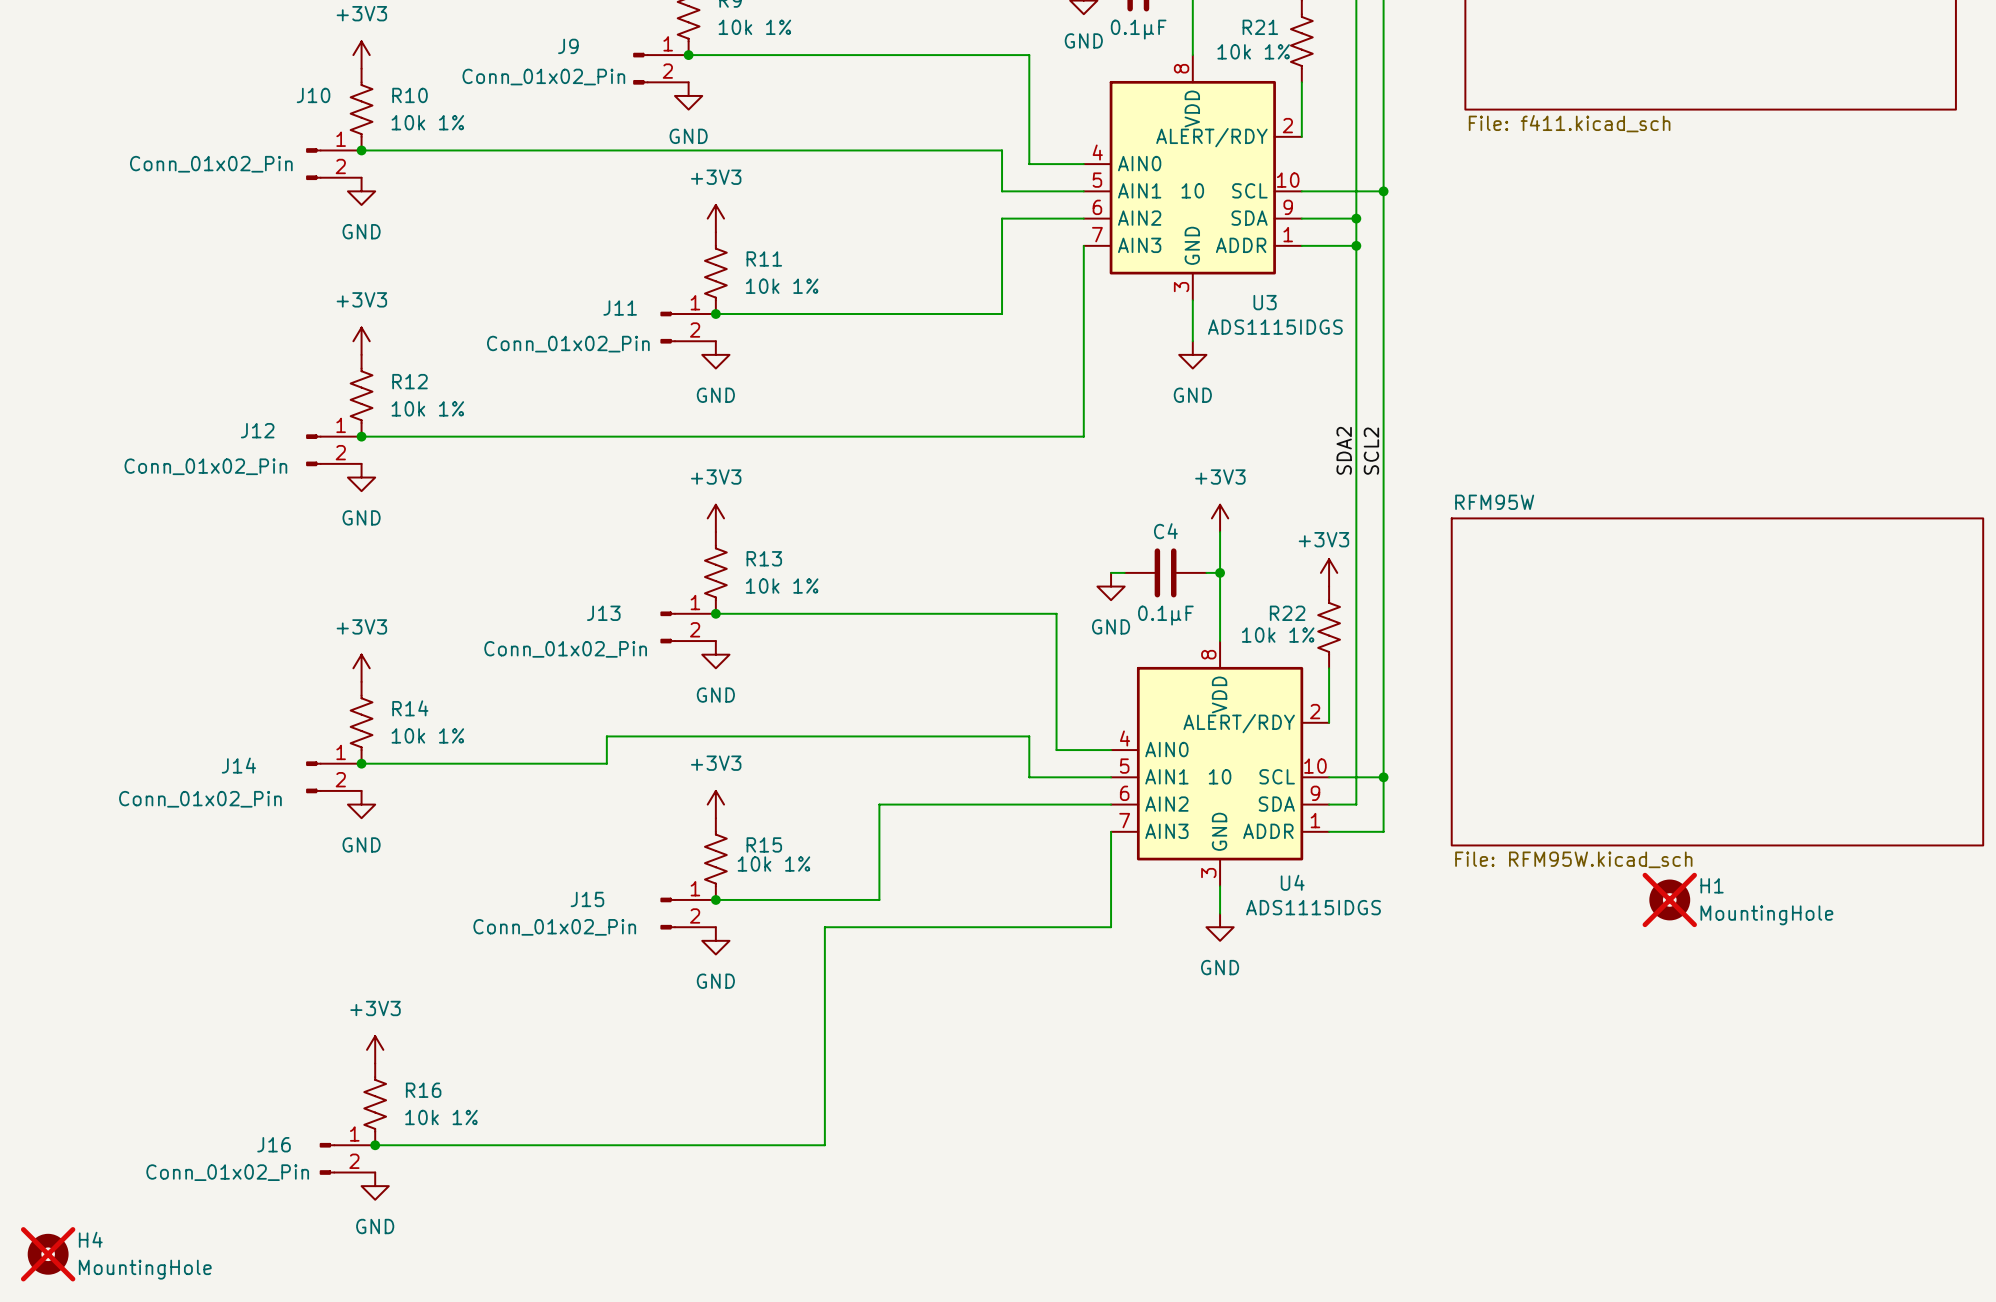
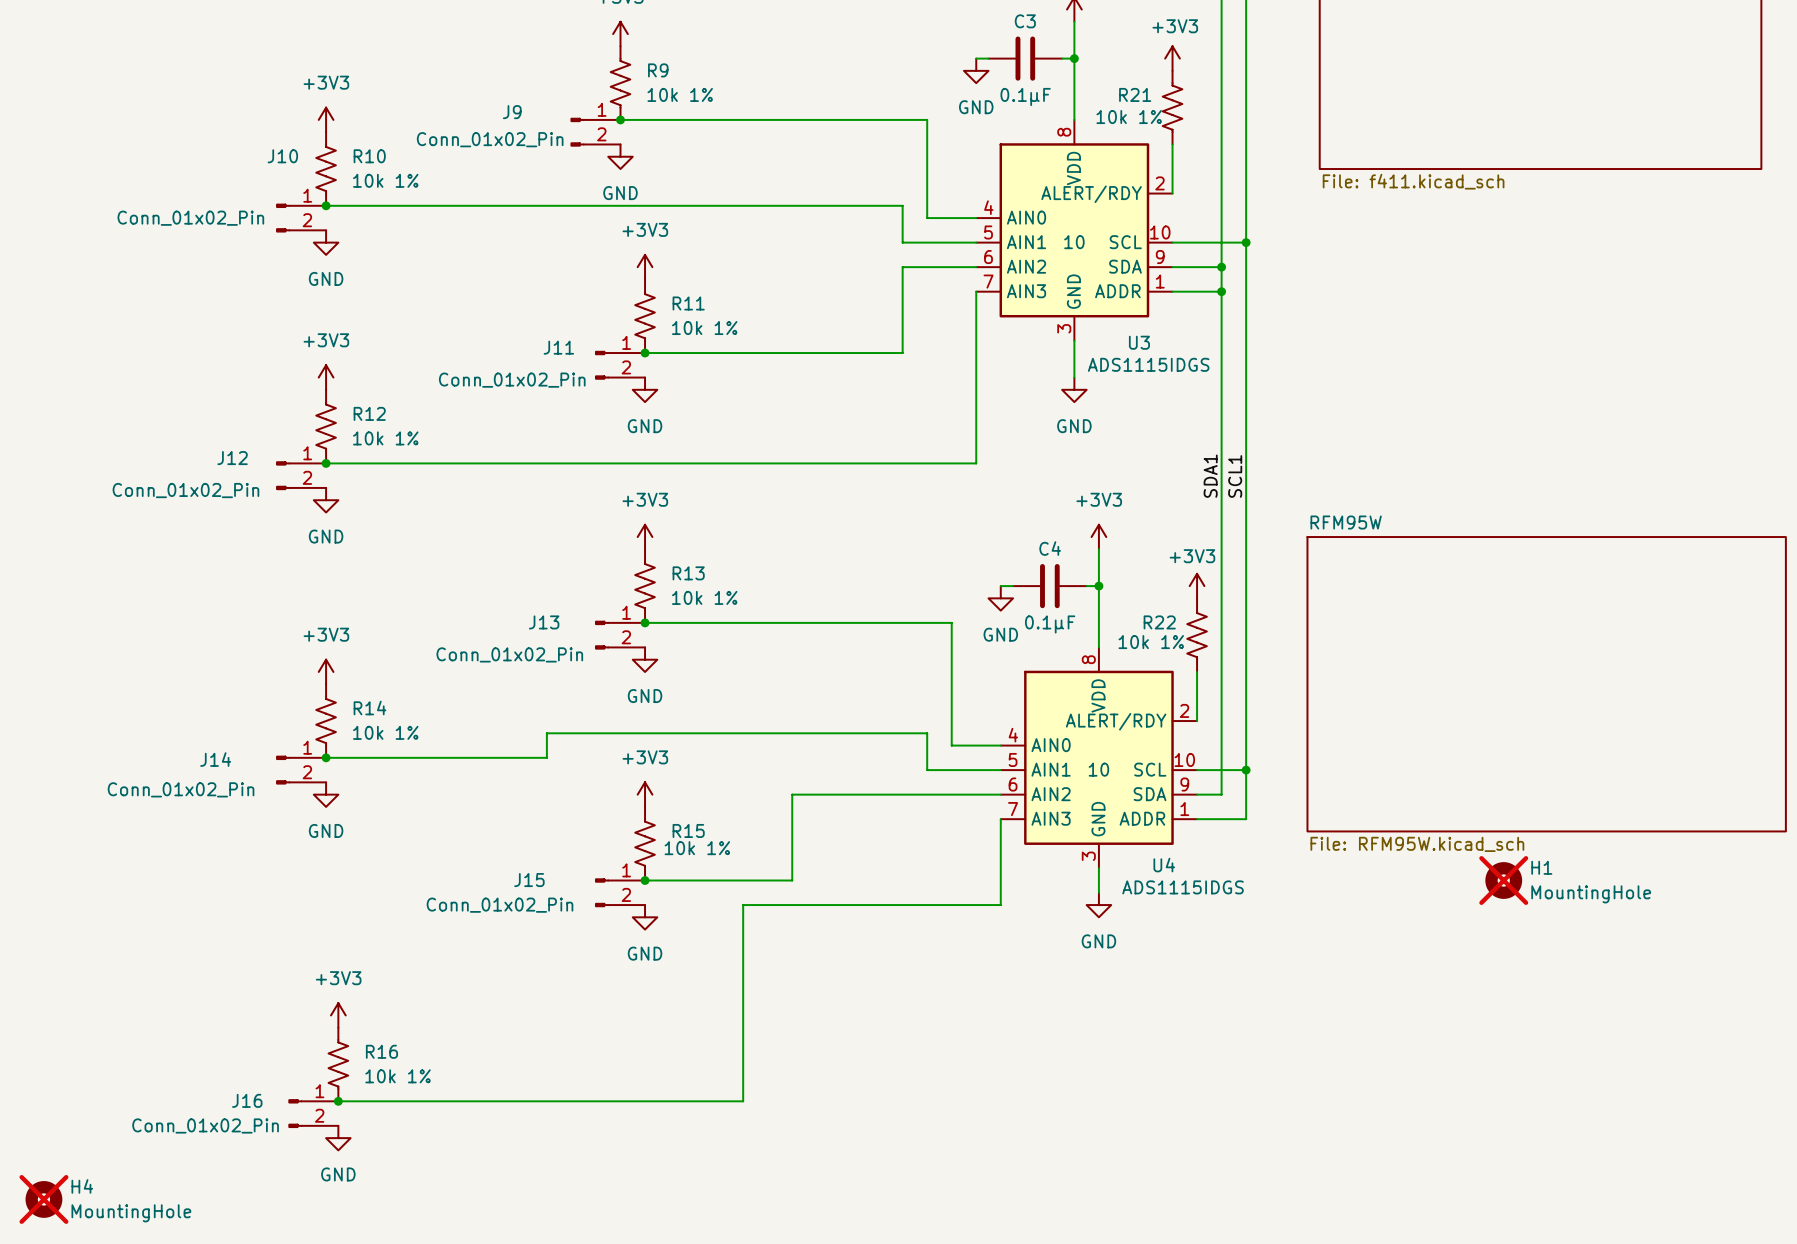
label: SDA2 (1344, 450) -> SDA1 (1210, 476)
label: SCL2 (1371, 451) -> SCL1 (1235, 476)

